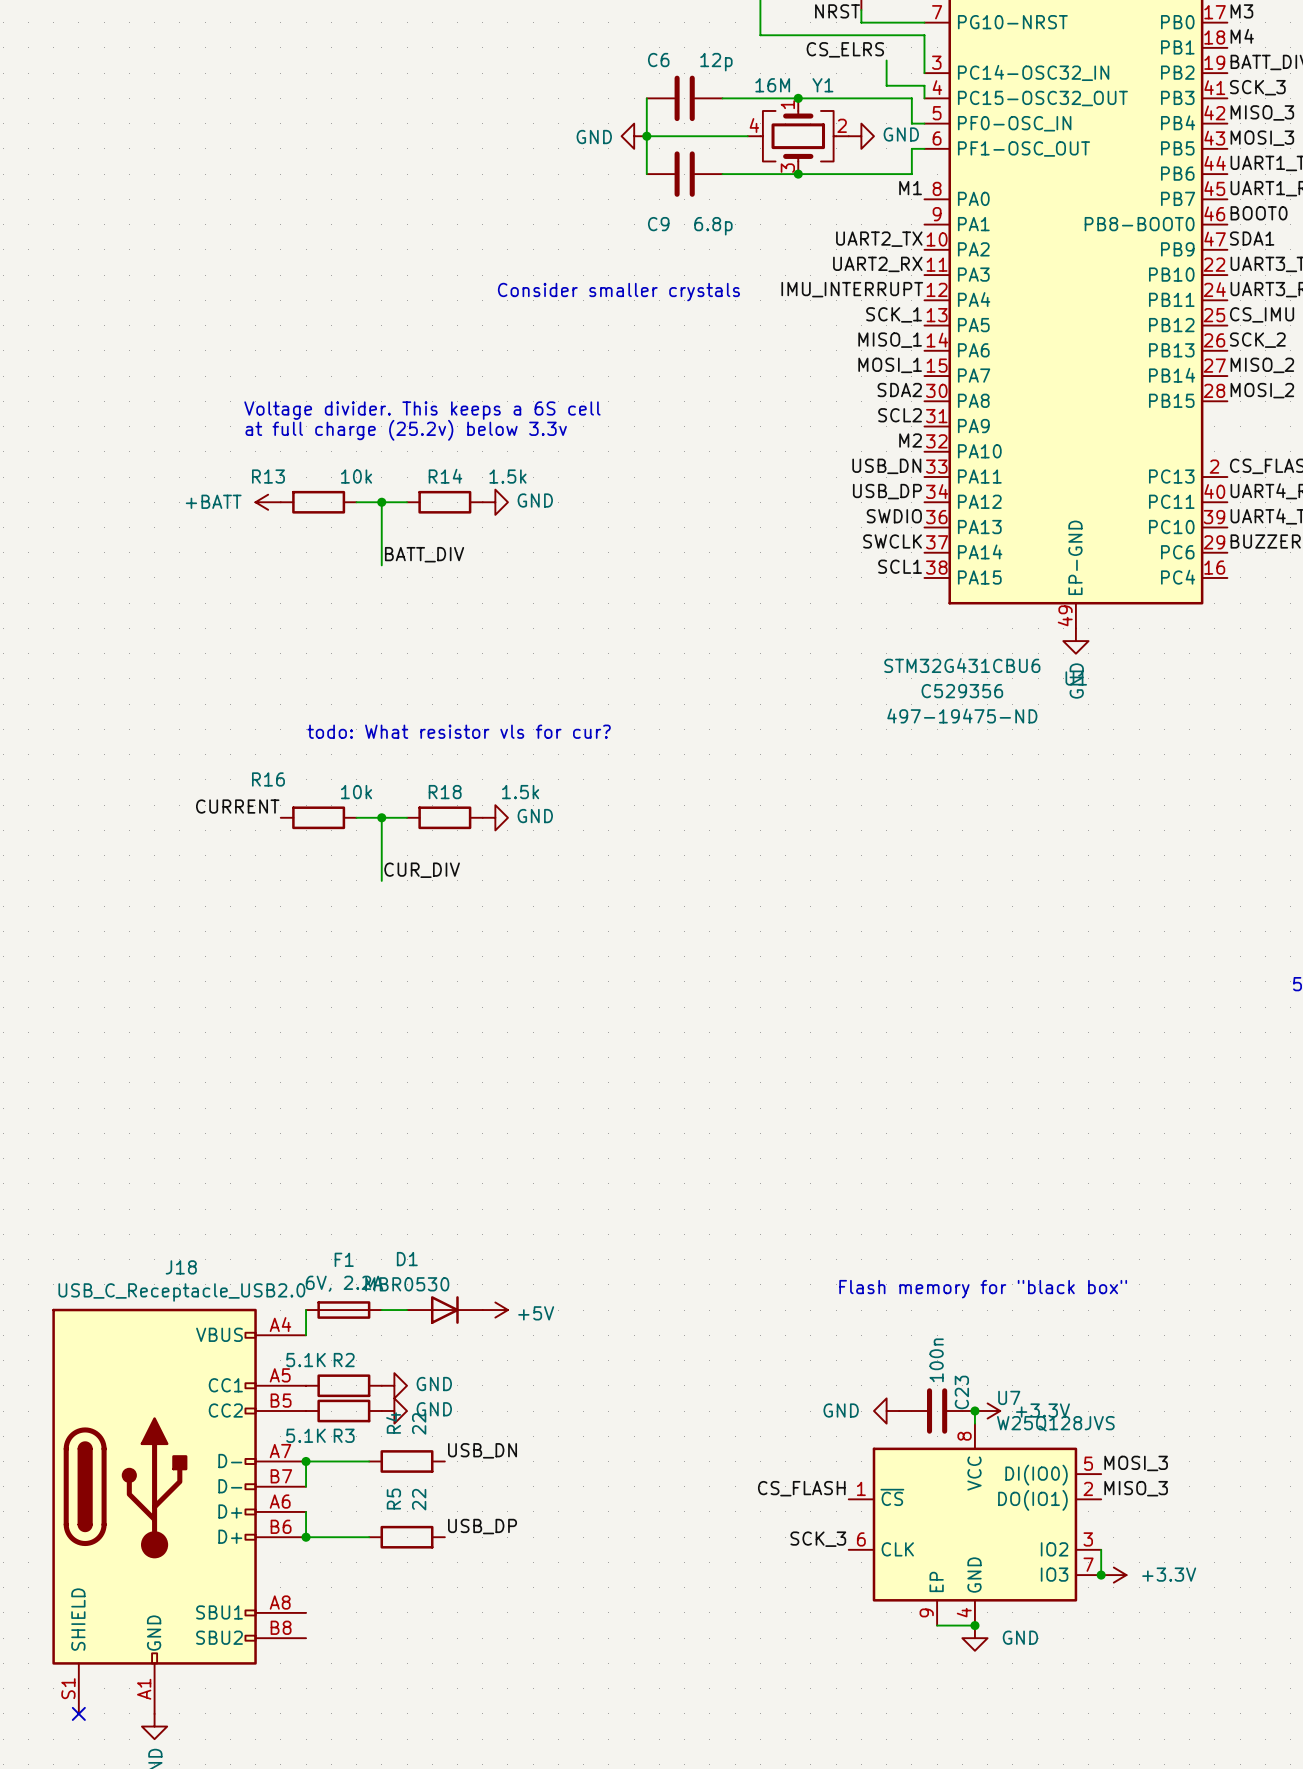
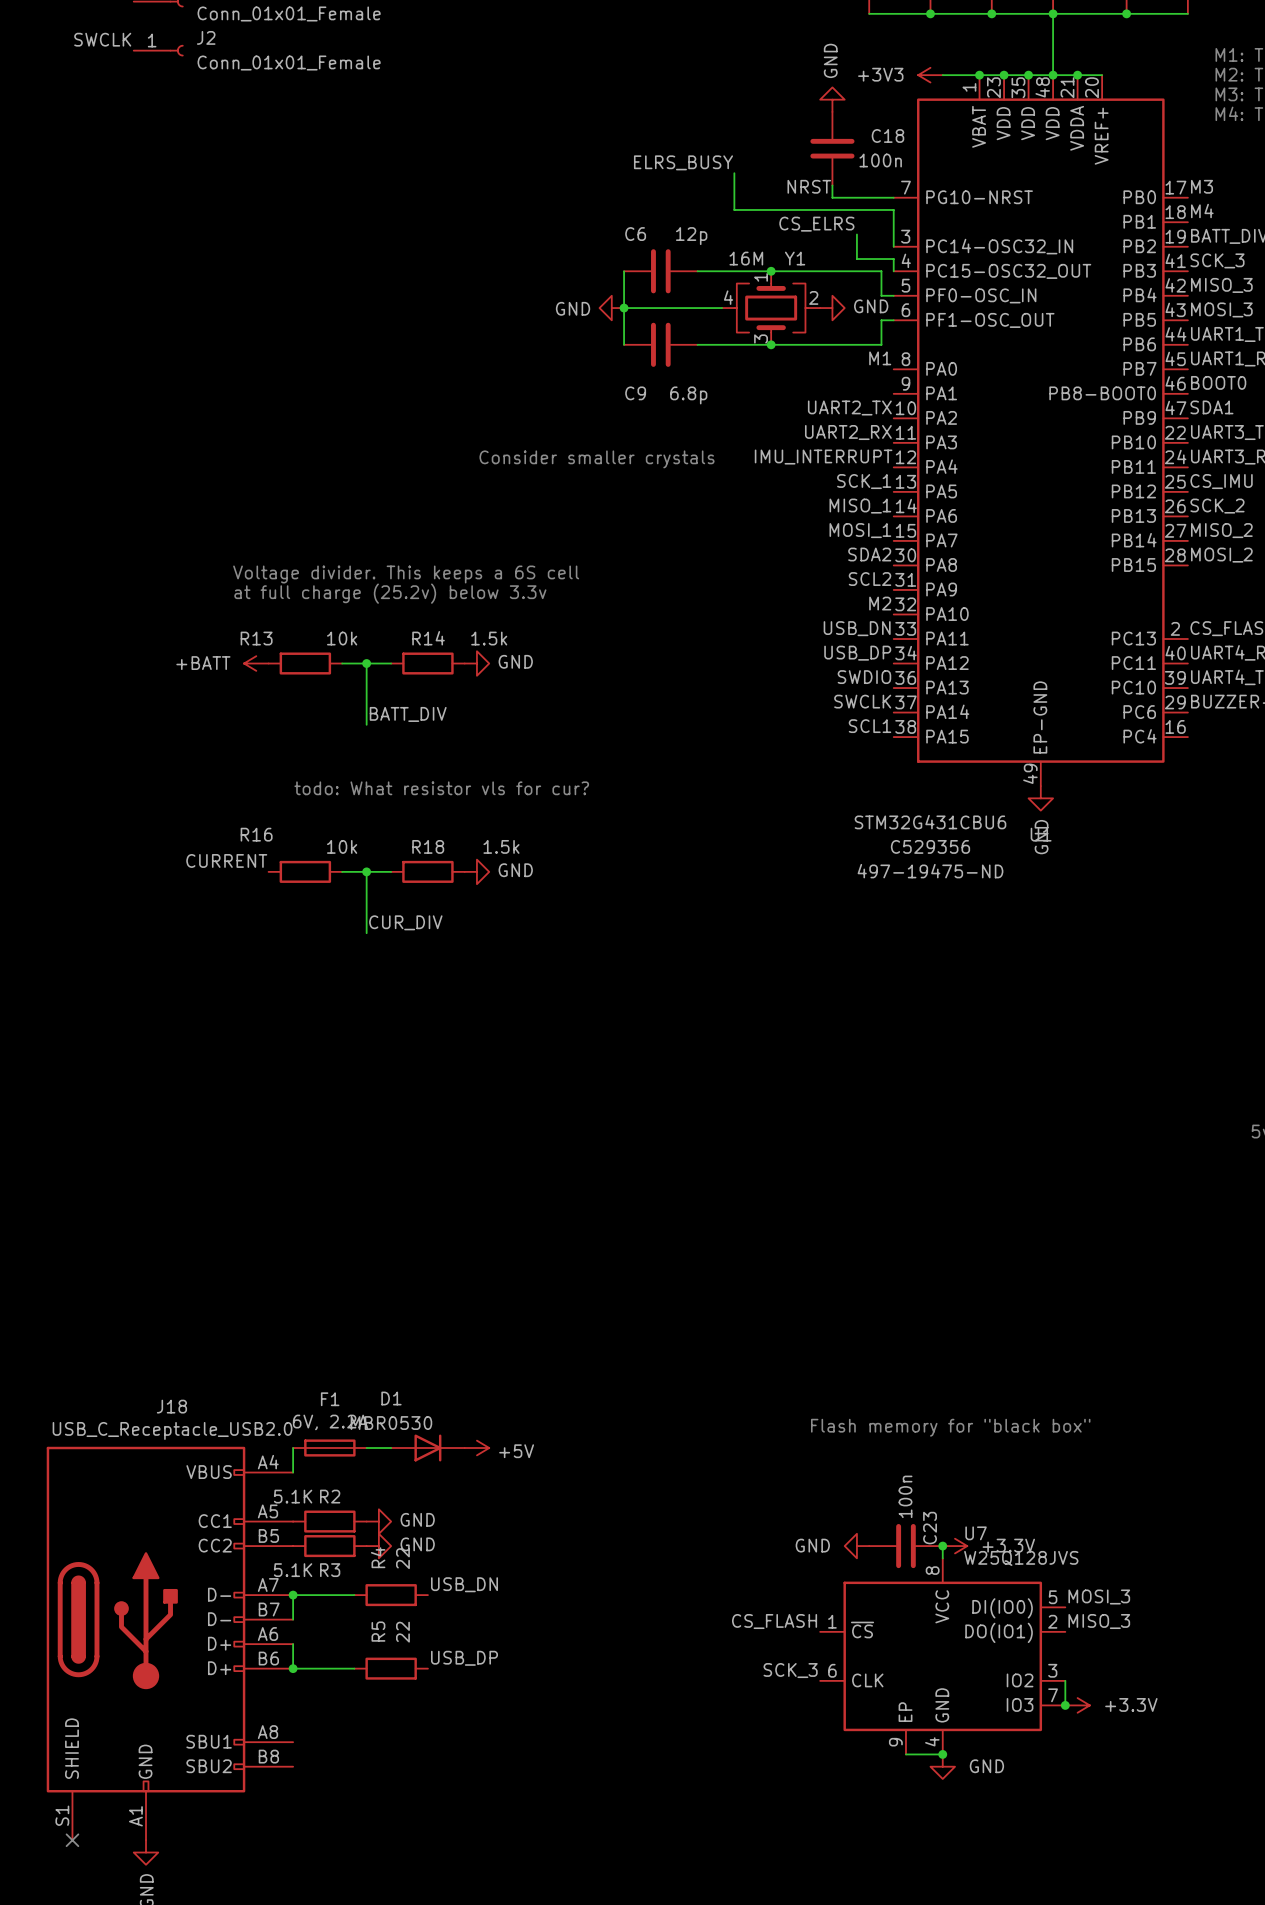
junction: none -> (366, 871)
text position: todo: What resistor vls for cur? (459, 731) -> todo: What resistor vls for cur? (441, 788)
label position: CURRENT (237, 806) -> CURRENT (226, 860)
R16 position: (318, 817) -> (305, 871)
wire: (356, 817) (407, 817) -> (342, 871) (391, 871)
wire: (381, 817) (381, 880) -> (366, 871) (366, 933)
junction: (381, 817) -> none
R18 position: (444, 817) -> (427, 871)
power symbol position: GND (495, 817) -> GND (476, 871)
label position: CUR_DIV (422, 870) -> CUR_DIV (405, 922)

